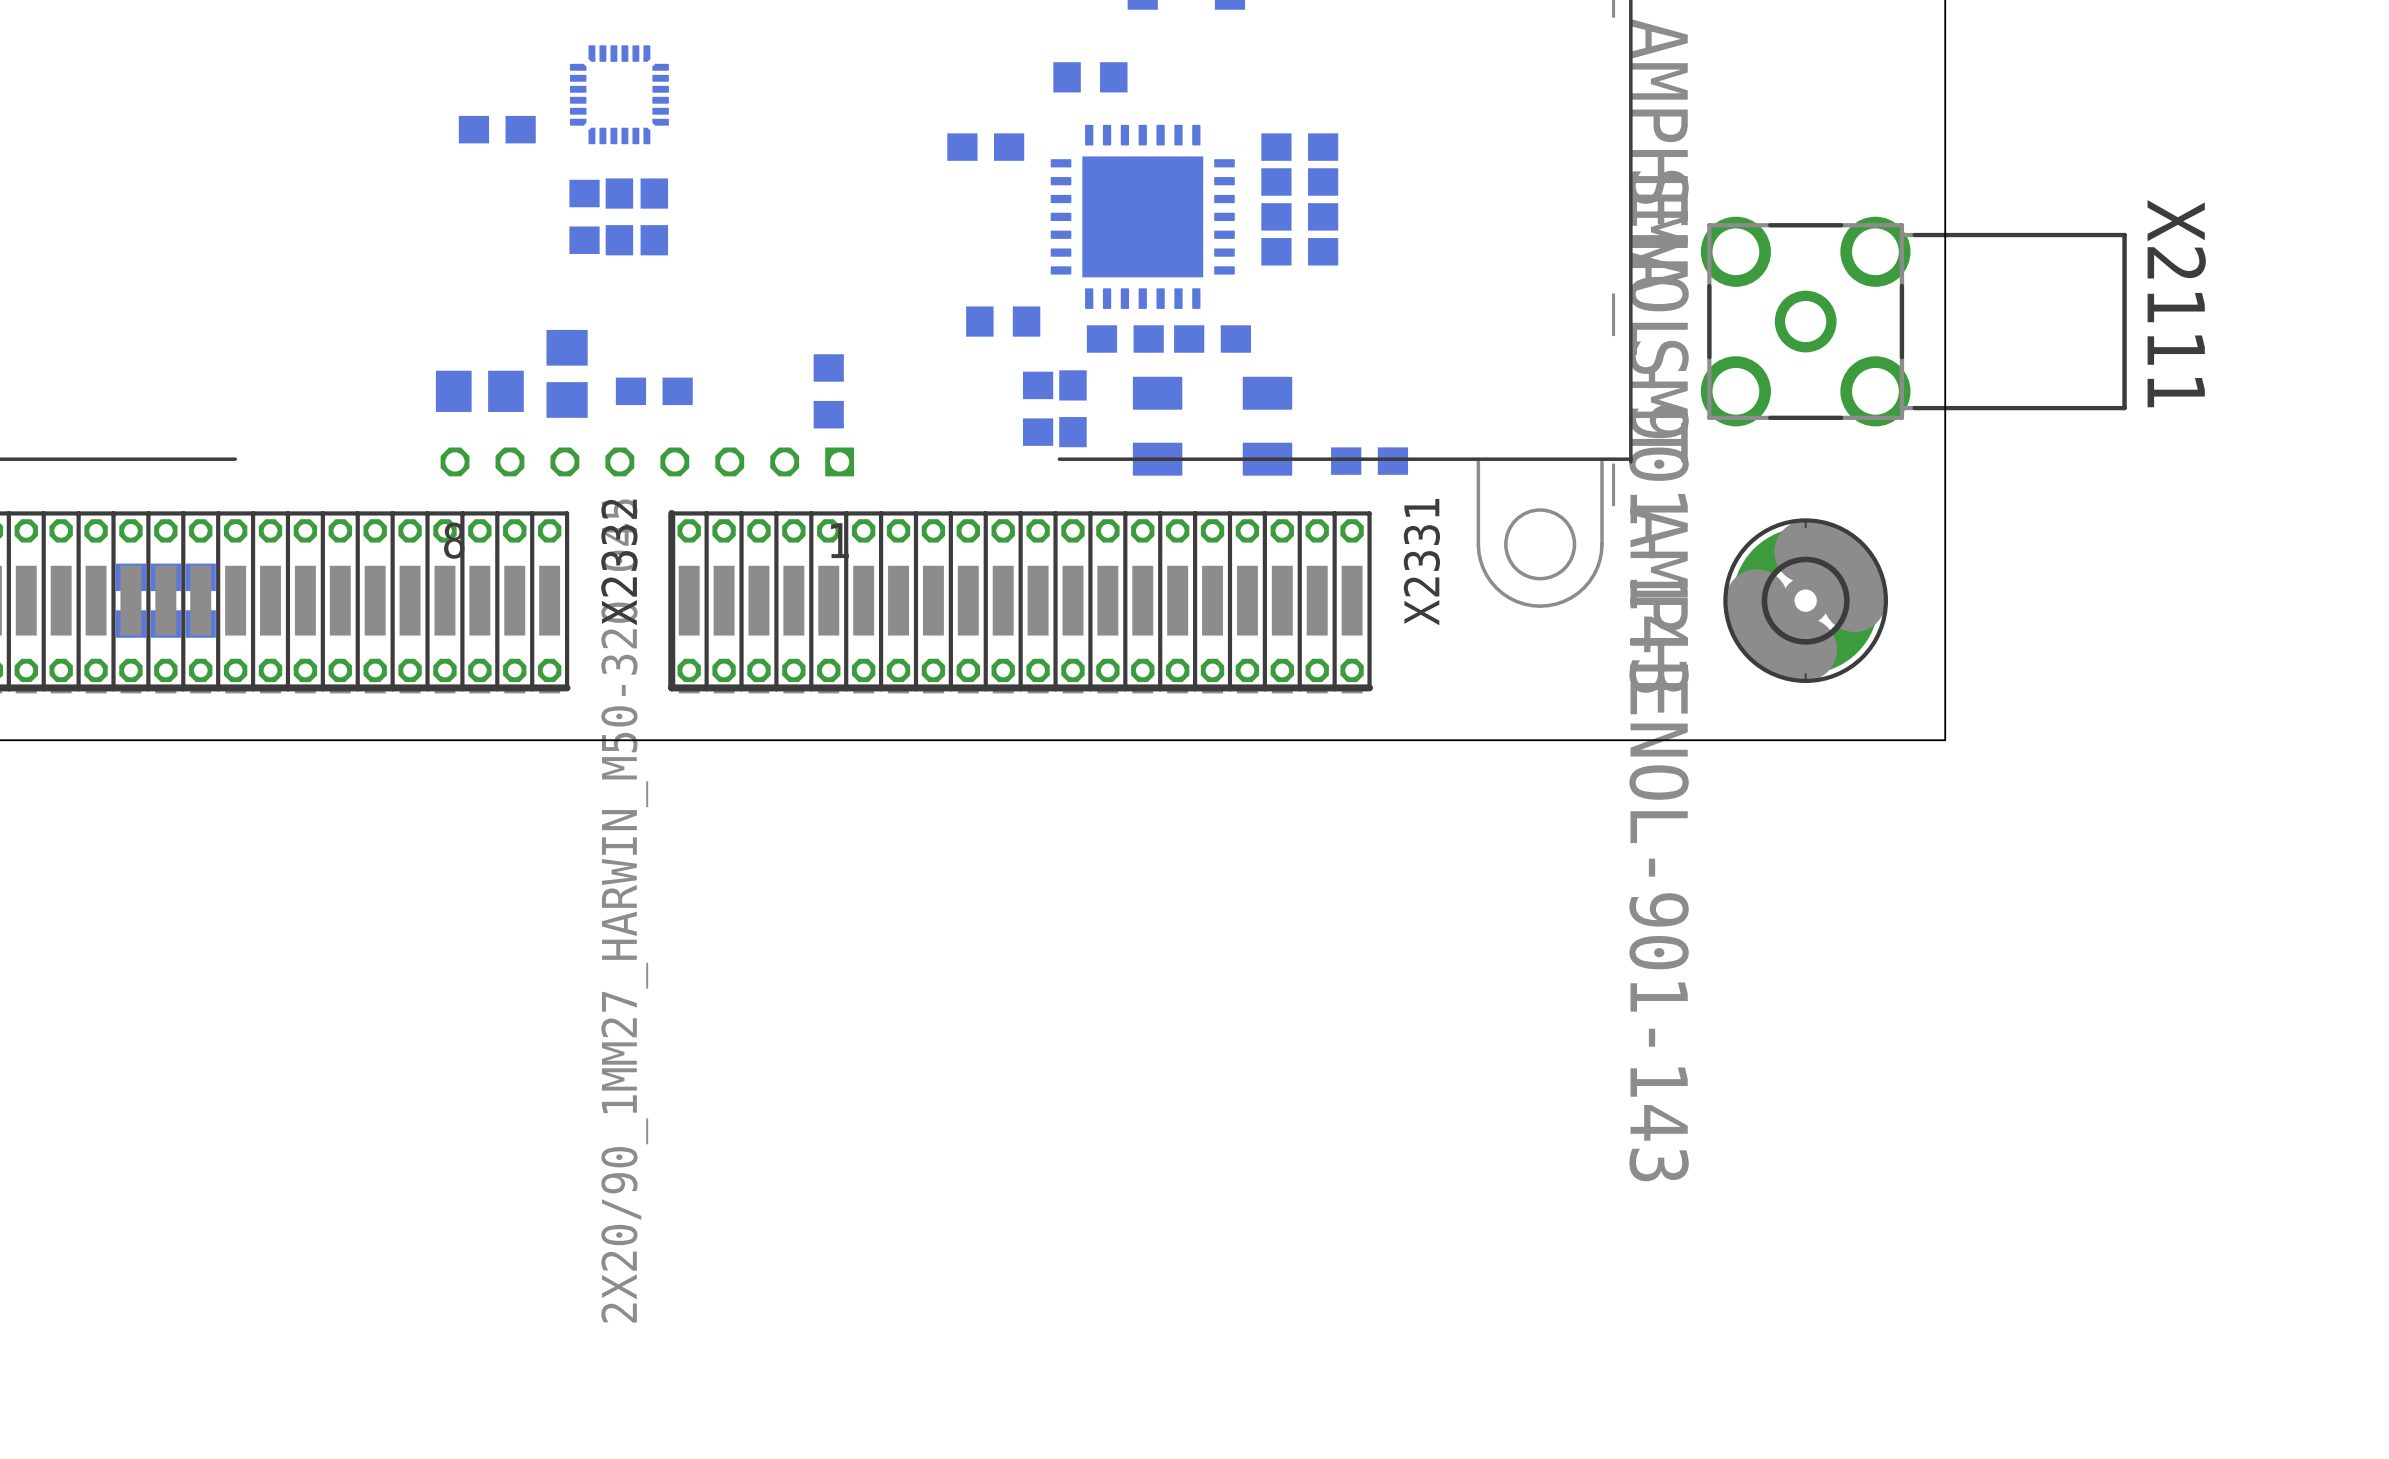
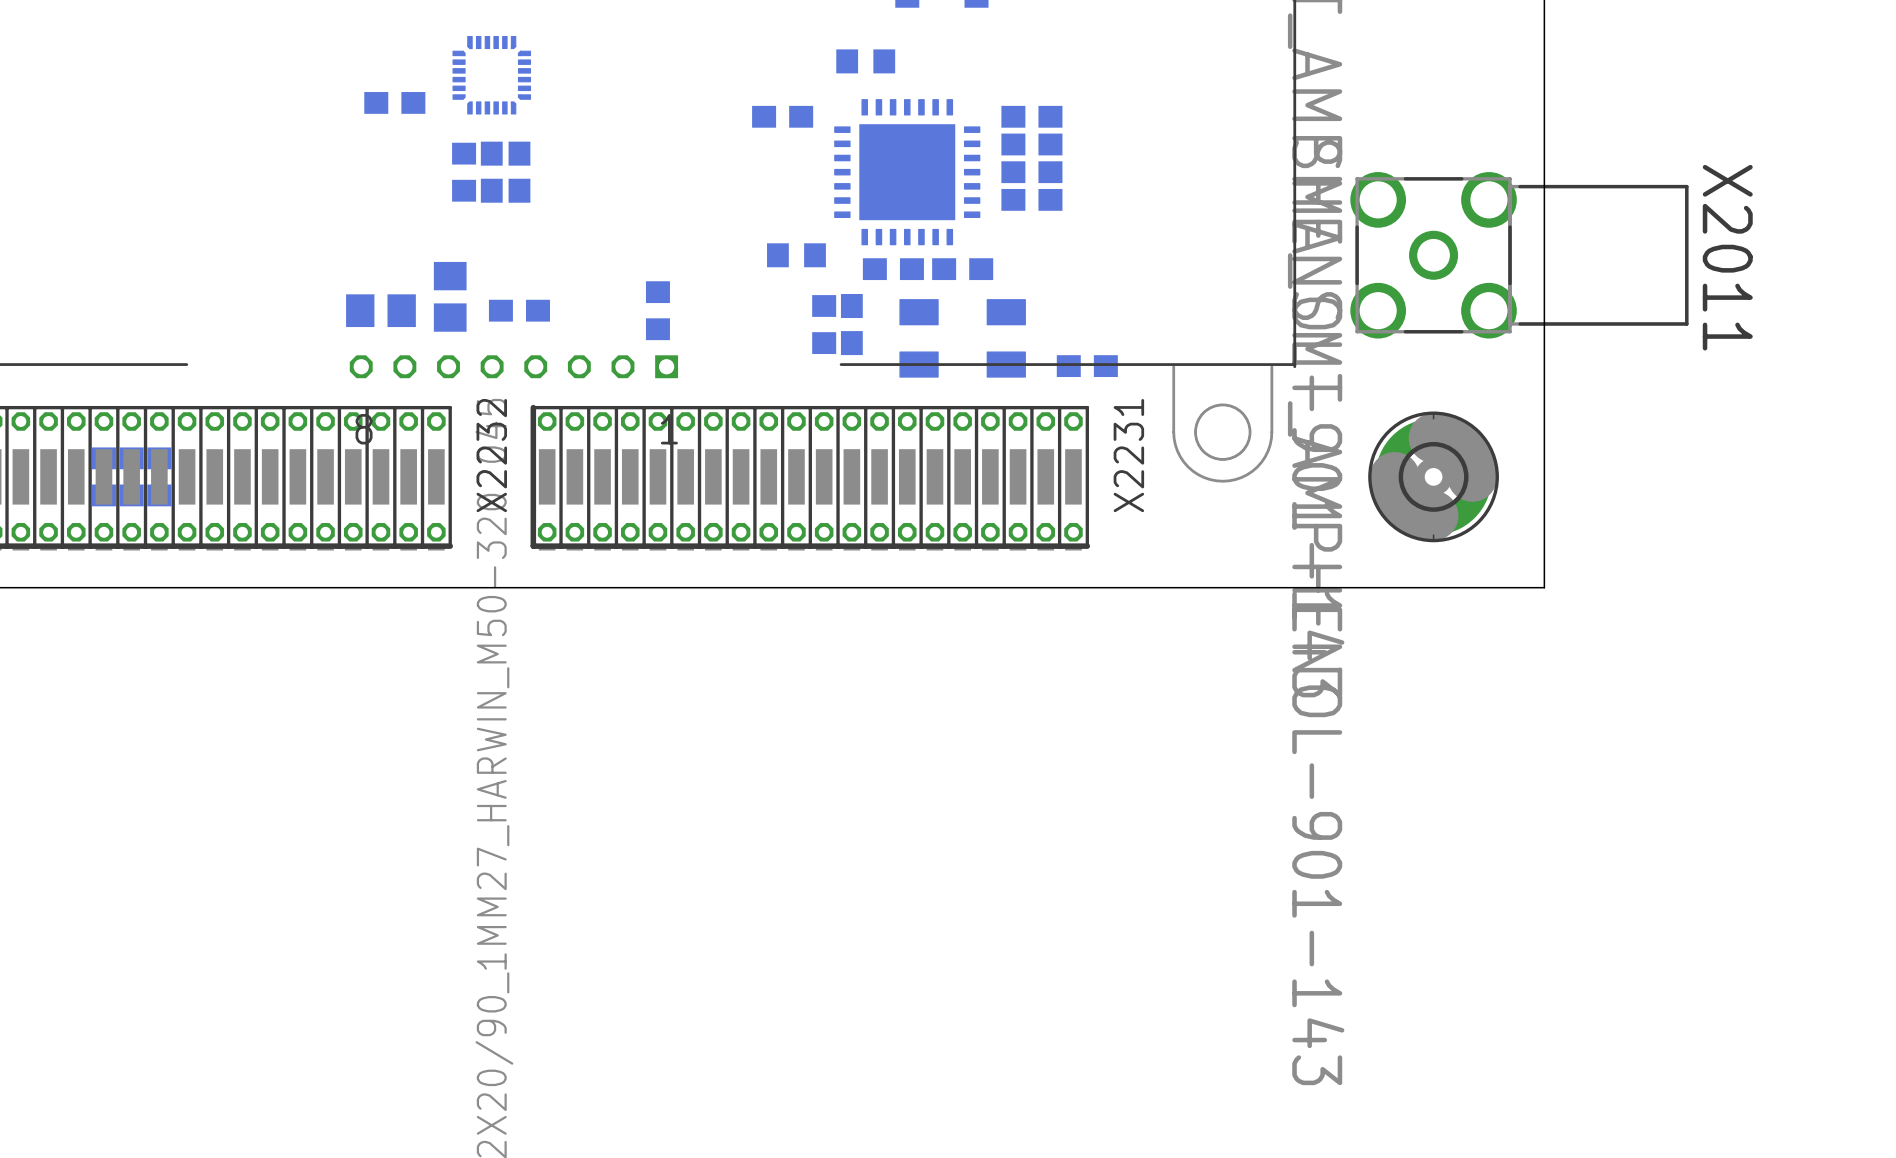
X2111 name: X2111 (2176, 303) -> X2011 (1727, 257)
X2332 name: X2332 (619, 562) -> X2232 (491, 455)
X2331 name: X2331 (1421, 562) -> X2231 (1128, 455)

